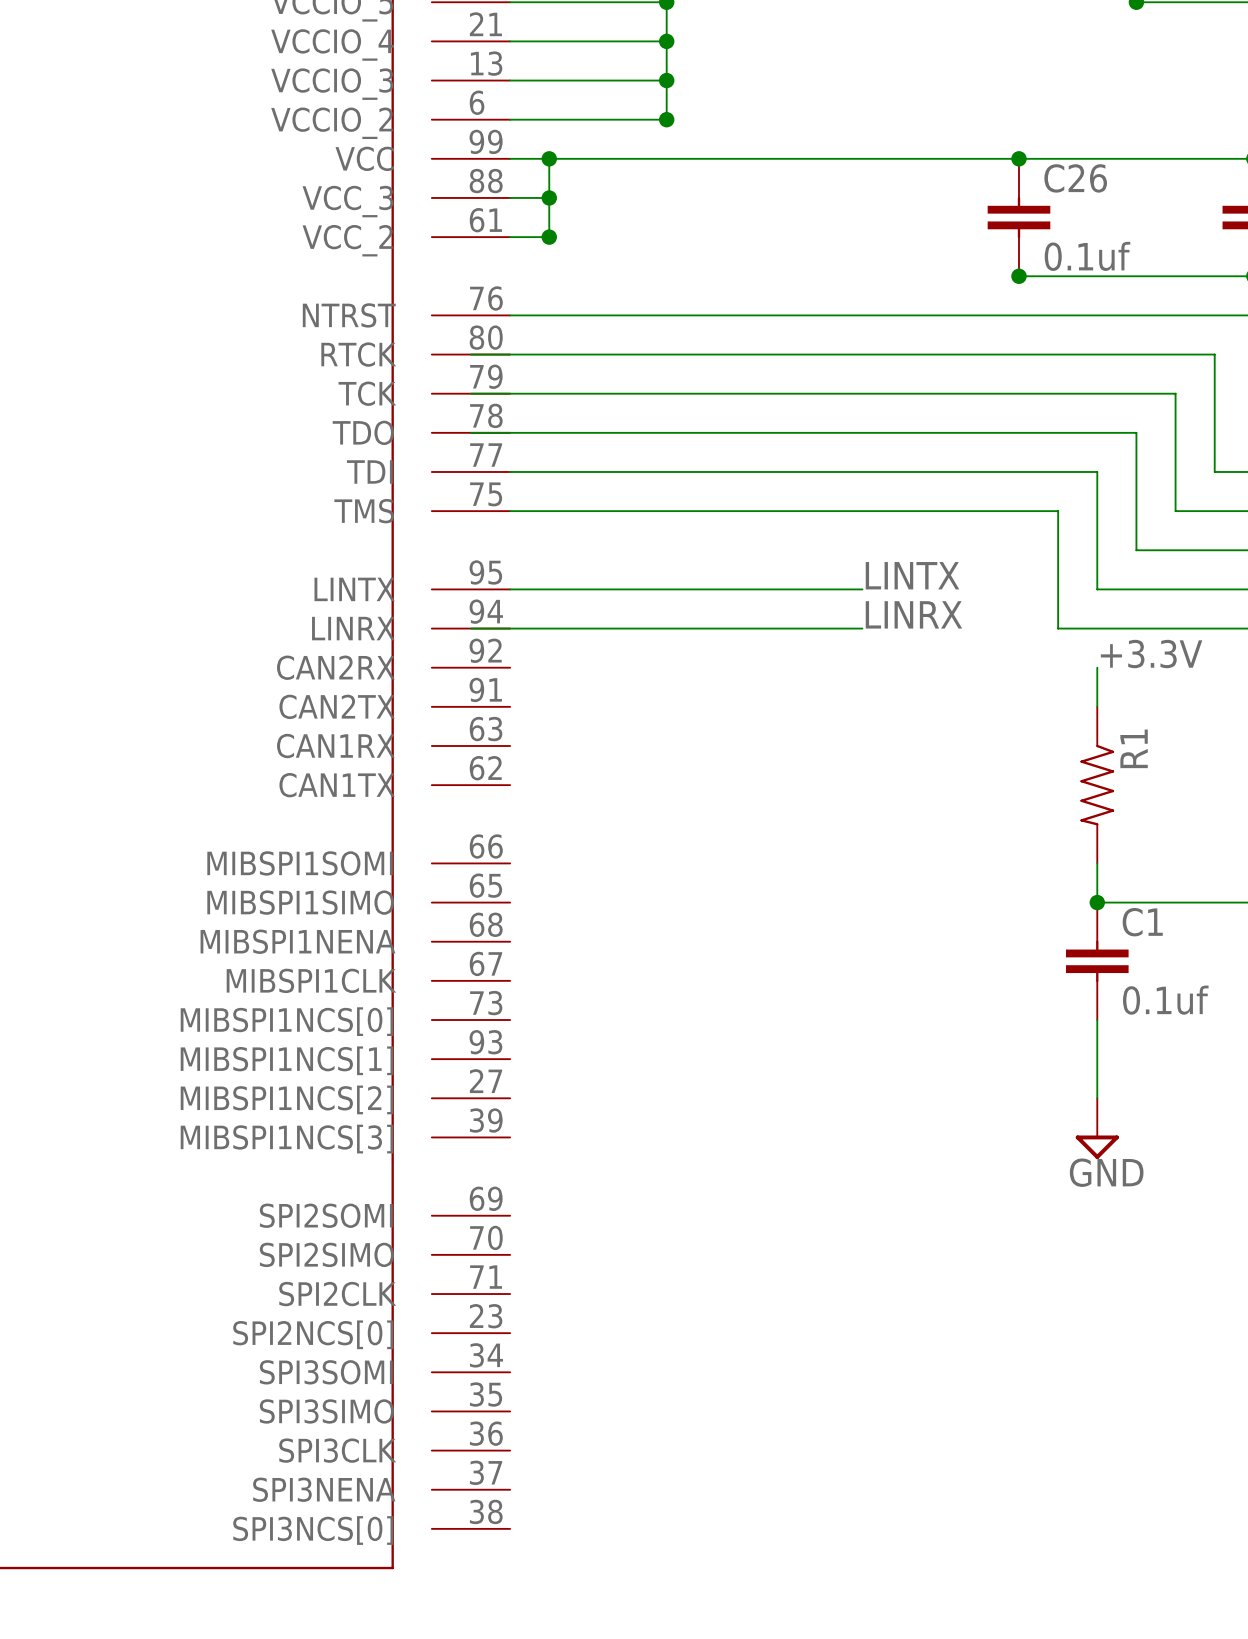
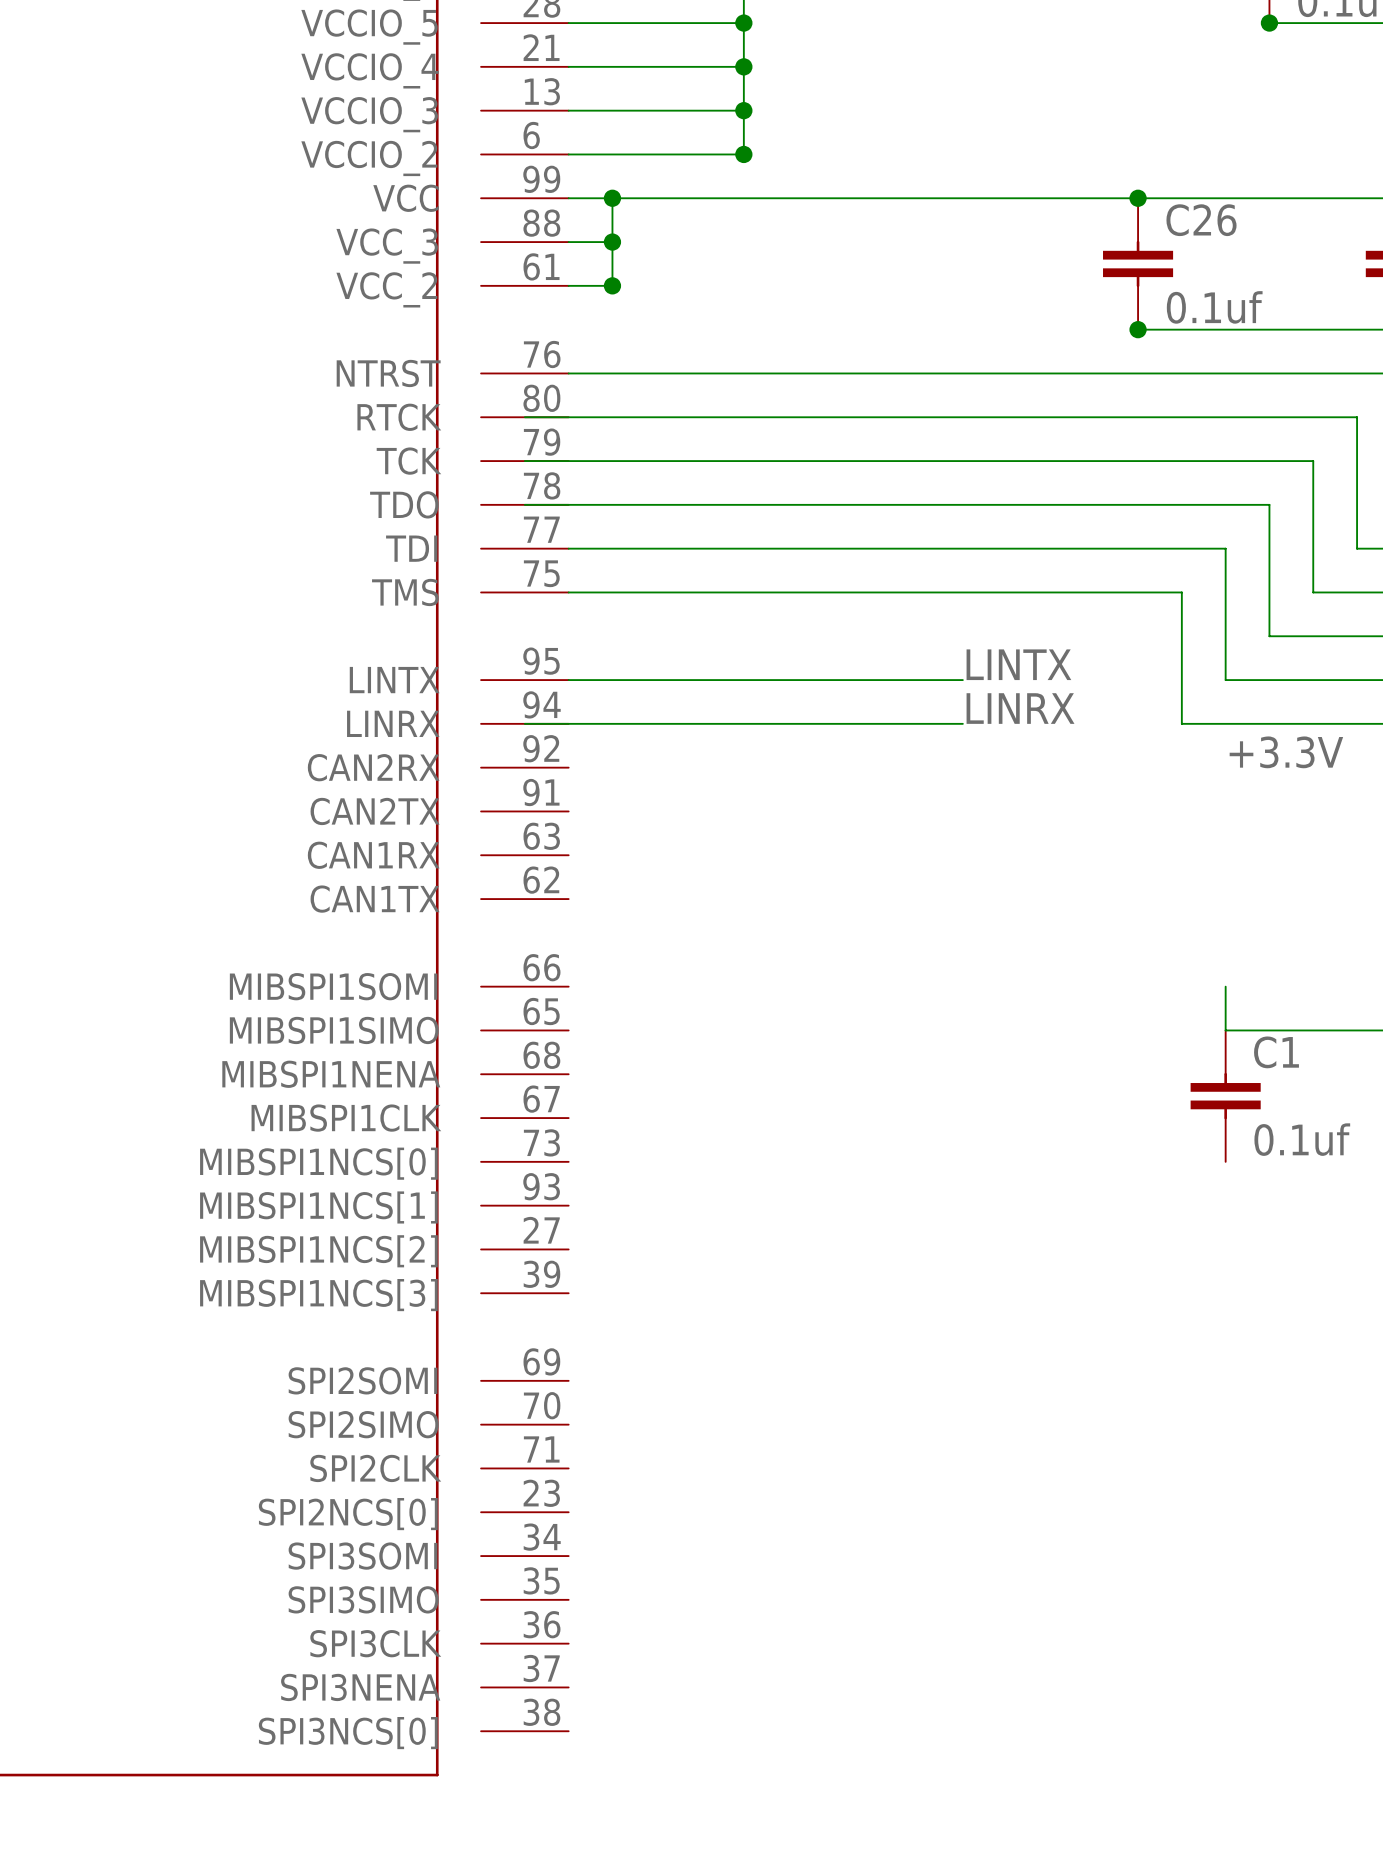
wire: (1097, 667) (1097, 706) -> none
R1: (1097, 785) -> none
junction: (1097, 902) -> none
wire: (1097, 1020) (1097, 1098) -> none
power symbol: GND (1097, 1128) -> none

